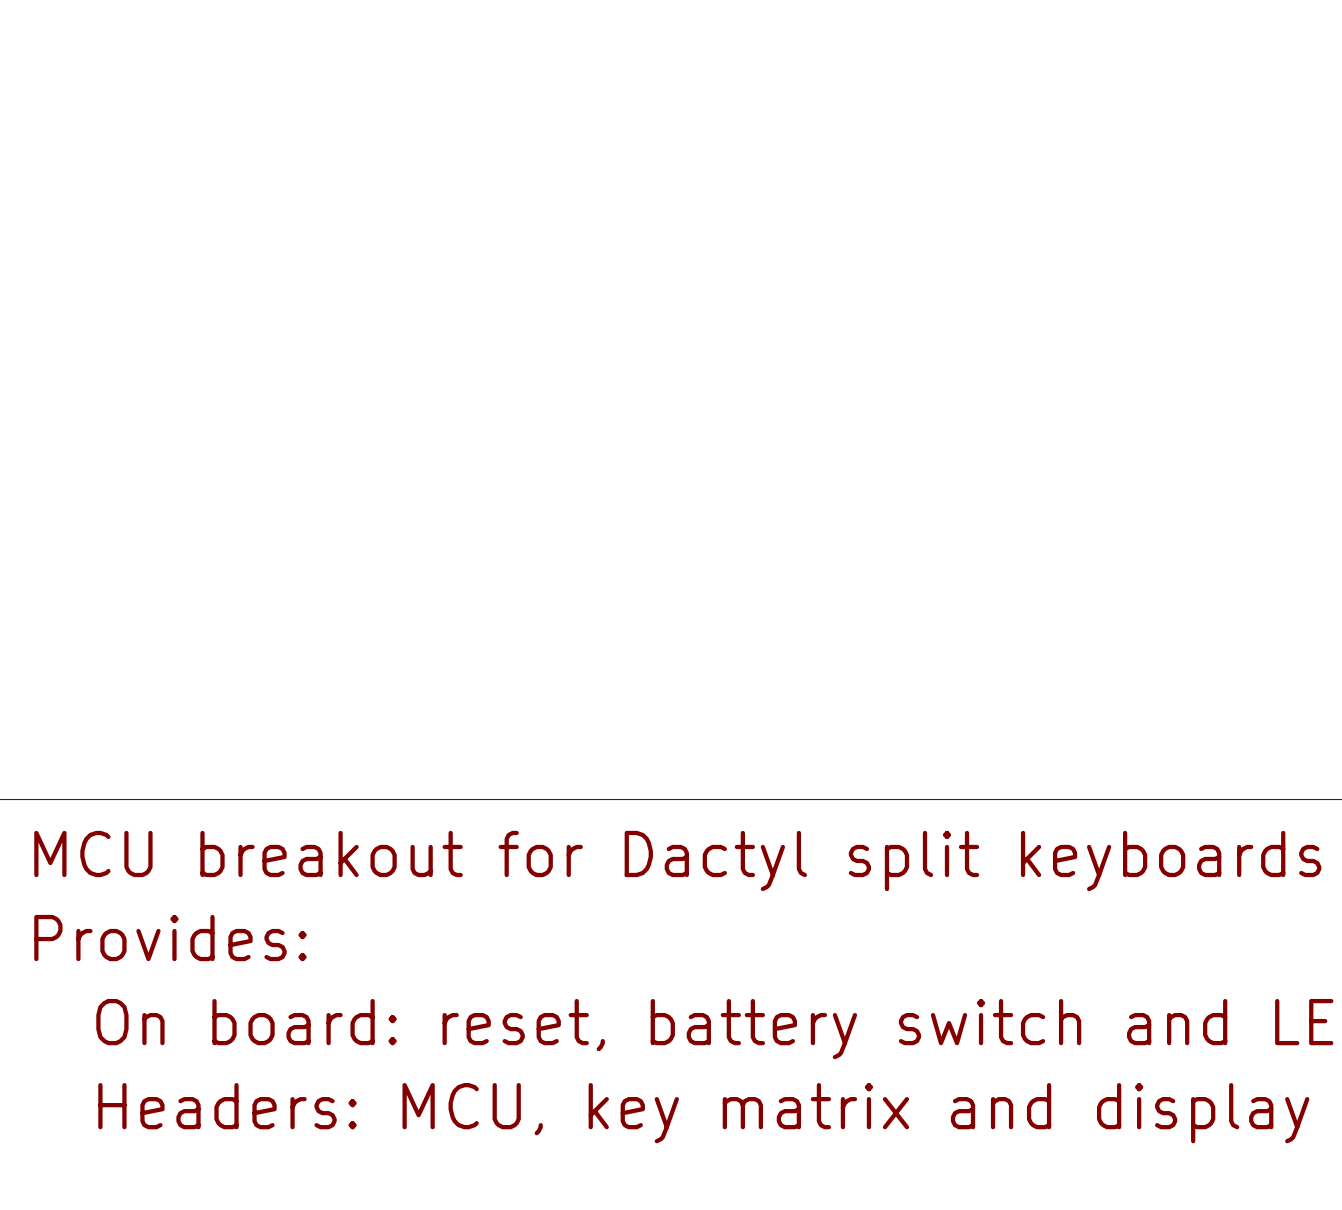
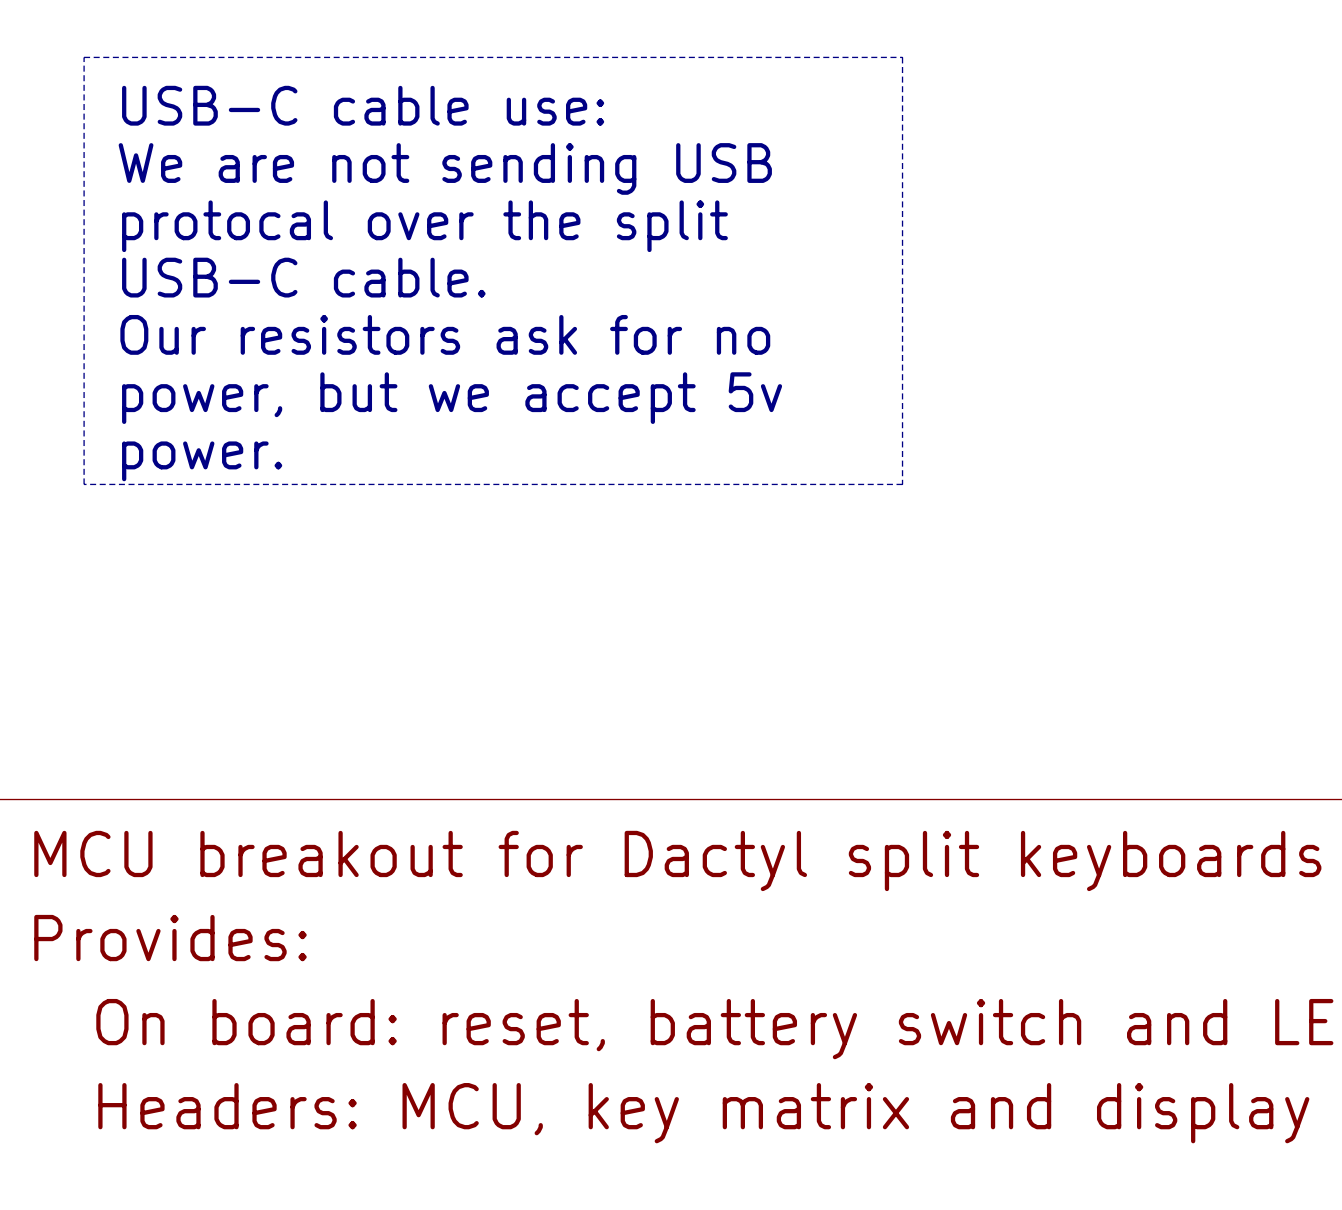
line: none -> (84, 57) (902, 57) (902, 484) (84, 484) (84, 57)
text: none -> USB-C cable use: (363, 105)
text: none -> We are not sending USB (445, 168)
text: none -> protocal over the split (424, 226)
text: none -> USB-C cable. (303, 277)
text: none -> Our resistors ask for no (445, 334)
text: none -> power, but we accept 5v (452, 398)
text: none -> power. (202, 461)

